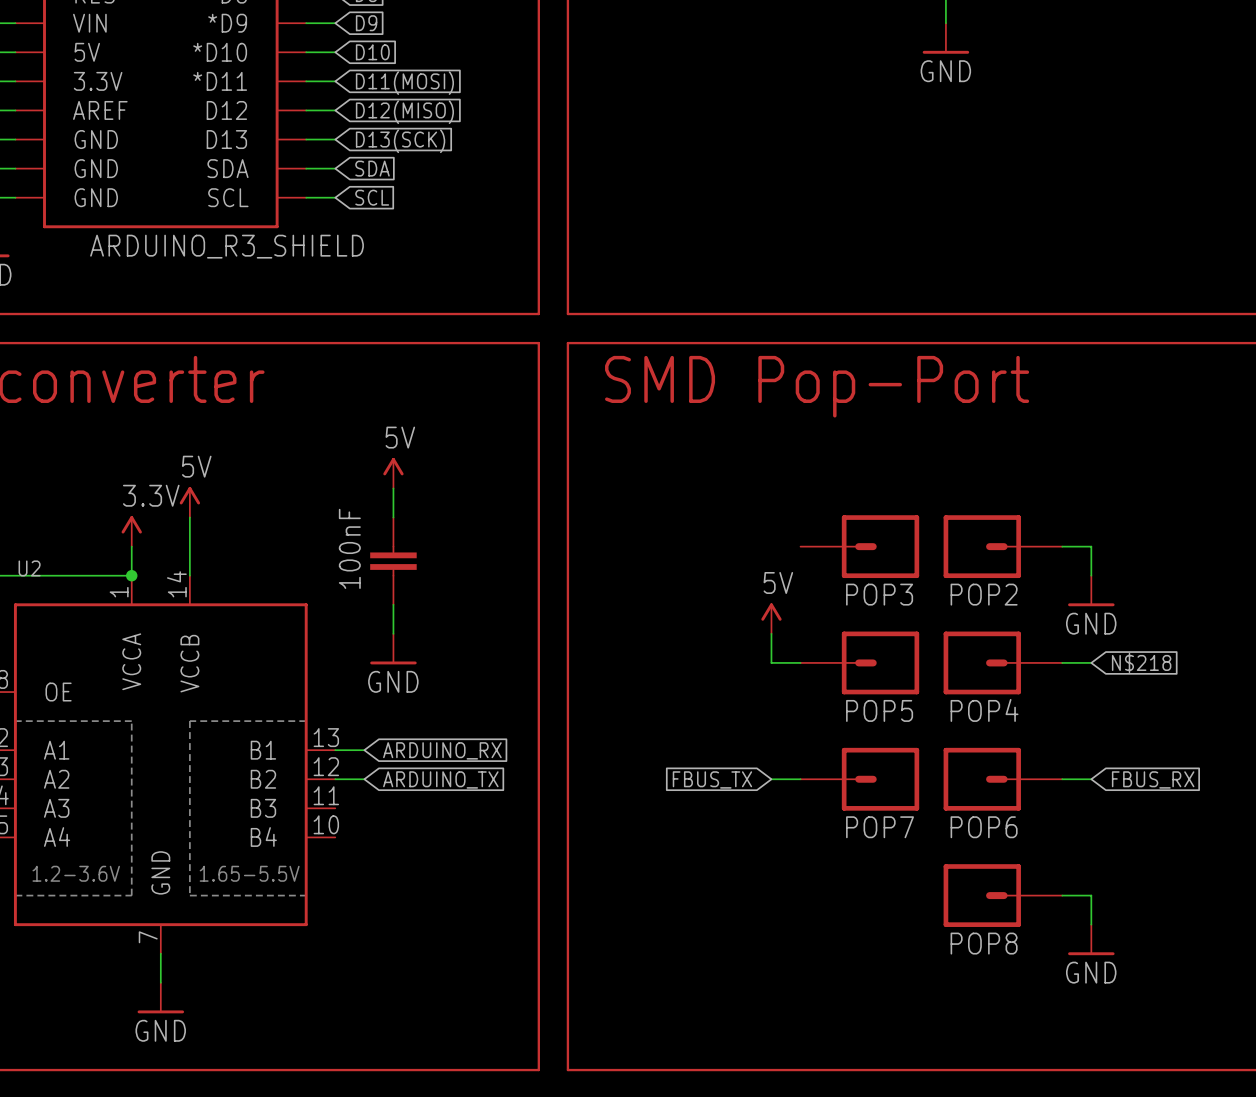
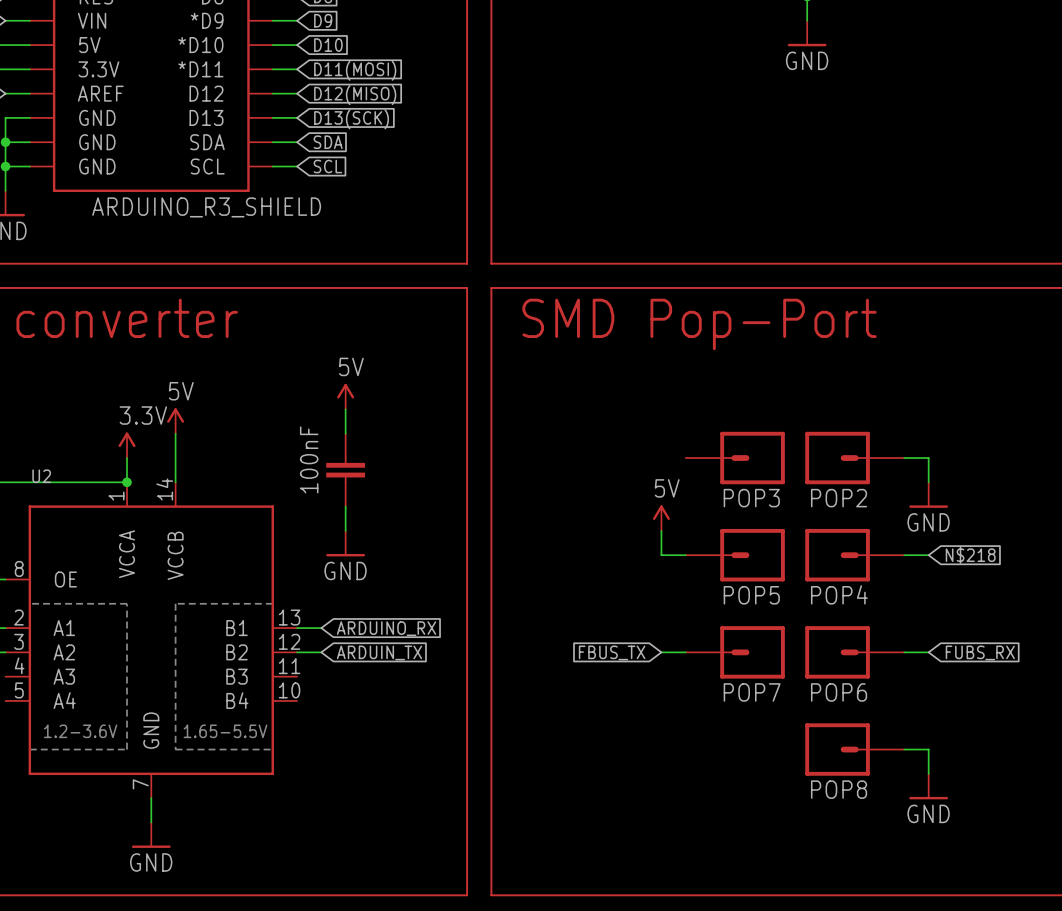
global label: ARDUINO_TX (440, 779) -> ARDUIN_TX (379, 652)
global label: FBUS_RX (1153, 779) -> FUBS_RX (980, 652)

